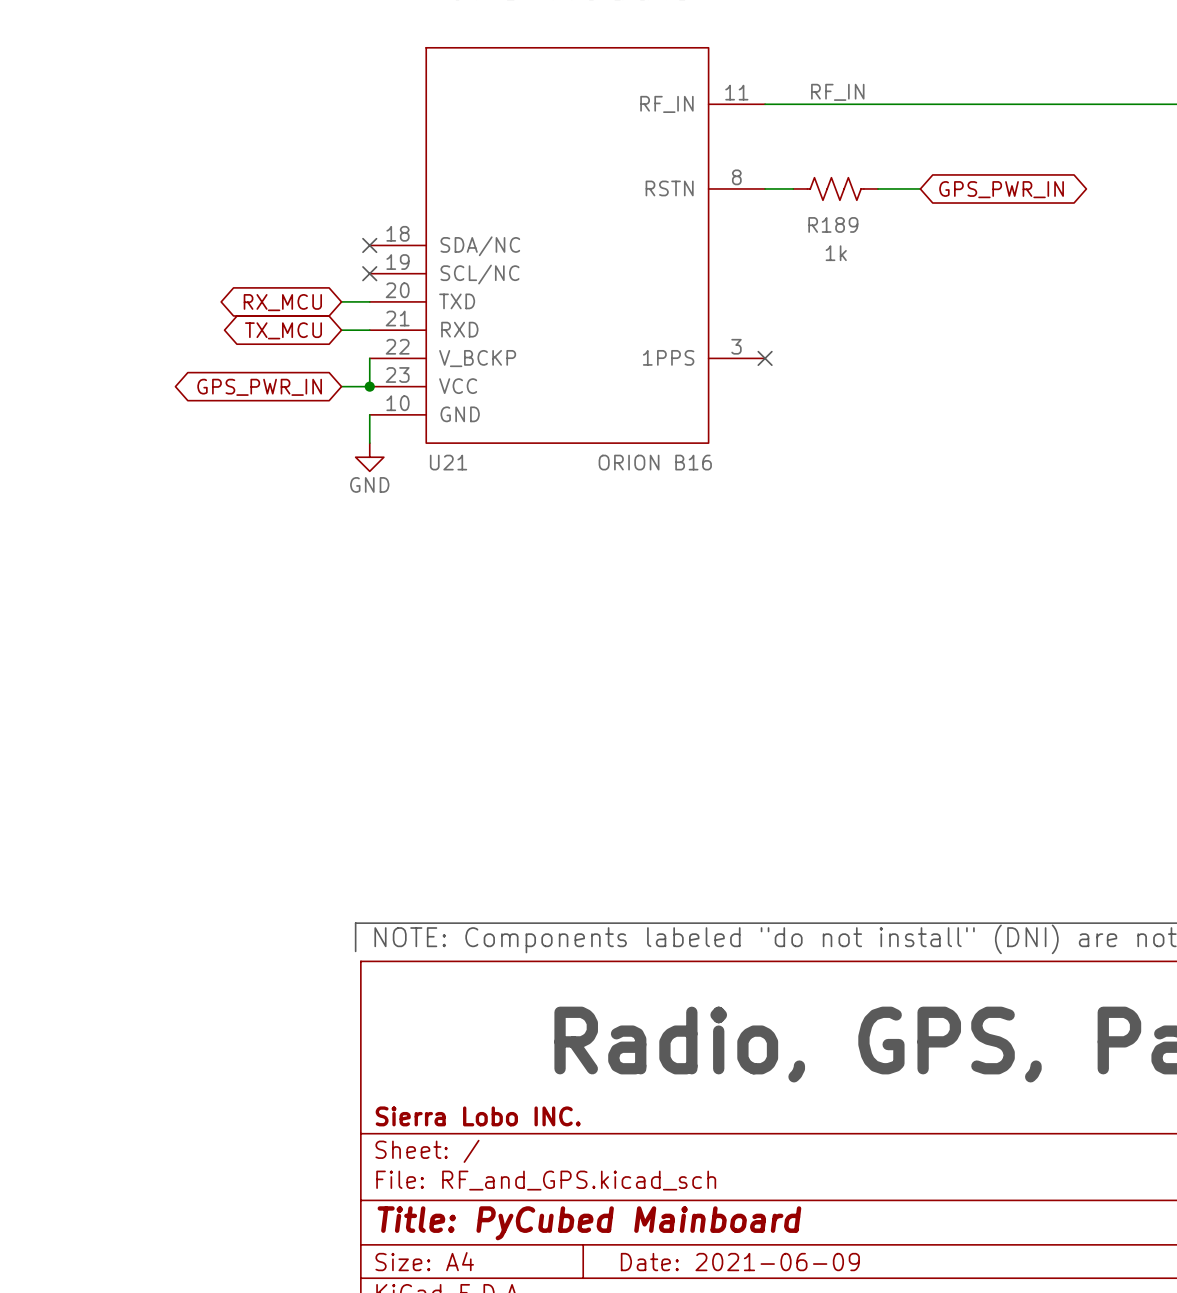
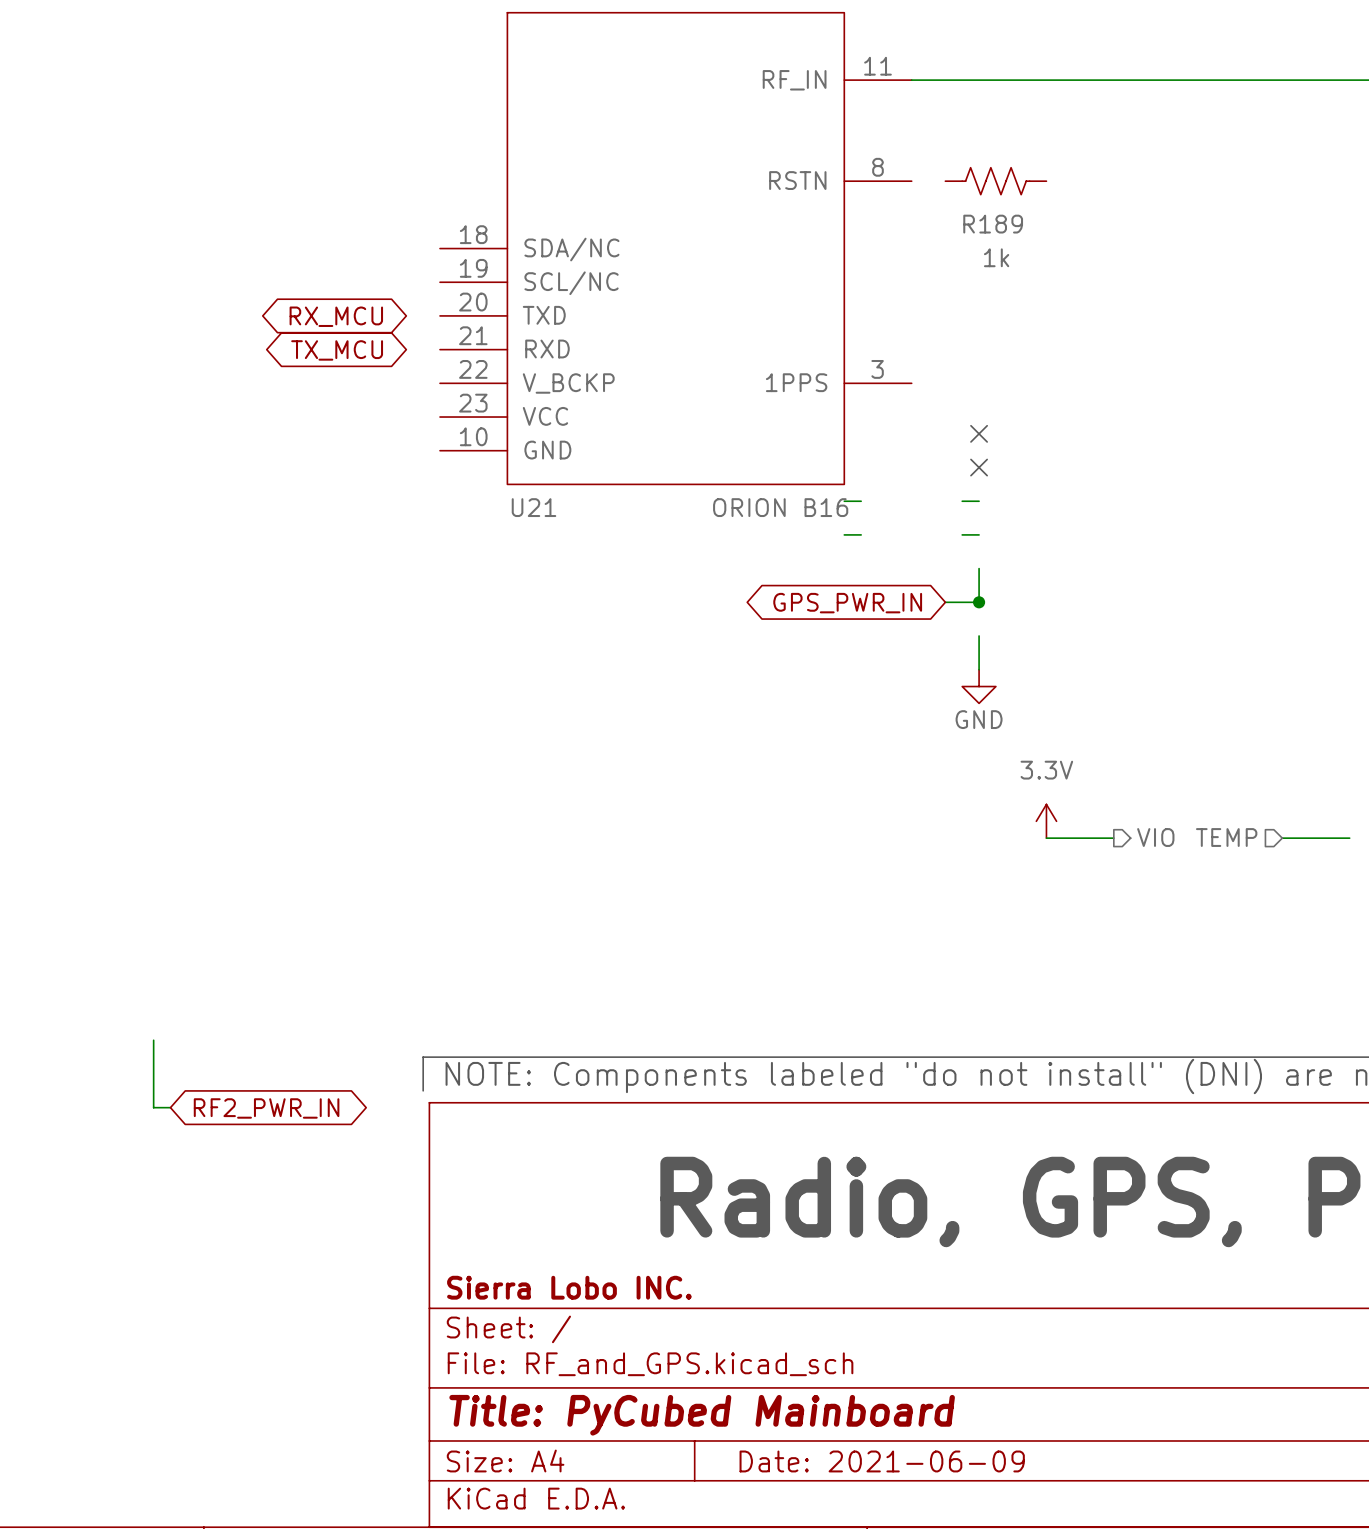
label: RF_IN (837, 92) -> none
wire: (765, 188) (793, 188) -> none
wire: (878, 188) (920, 188) -> none
global label: GPS_PWR_IN (1001, 189) -> none
no-connect mark: (369, 245) -> none
no-connect mark: (369, 273) -> none
wire: (341, 301) (369, 301) -> none
wire: (341, 330) (369, 330) -> none
wire: (369, 358) (369, 386) (341, 386) -> none
no-connect mark: (765, 358) -> none
junction: (369, 386) -> none
global label: GPS_PWR_IN (259, 387) -> none
no-connect mark: none -> (979, 433)
wire: (369, 414) (369, 443) -> none
no-connect mark: none -> (979, 467)
power symbol: GND (369, 457) -> none
wire: none -> (844, 501) (861, 501)
wire: none -> (962, 501) (979, 501)
wire: none -> (844, 534) (861, 534)
wire: none -> (962, 534) (979, 534)
wire: none -> (979, 568) (979, 602) (945, 602)
junction: none -> (979, 602)
global label: none -> GPS_PWR_IN (847, 603)
wire: none -> (979, 636) (979, 669)
power symbol: none -> GND (979, 686)
power symbol: none -> 3.3V (1046, 821)
wire: none -> (1046, 838) (1113, 838)
sheet pin: none -> VIO (1155, 837)
sheet pin: none -> TEMP (1226, 837)
wire: none -> (1282, 838) (1349, 838)
wire: none -> (153, 1040) (153, 1107) (170, 1107)
global label: none -> RF2_PWR_IN (266, 1108)

